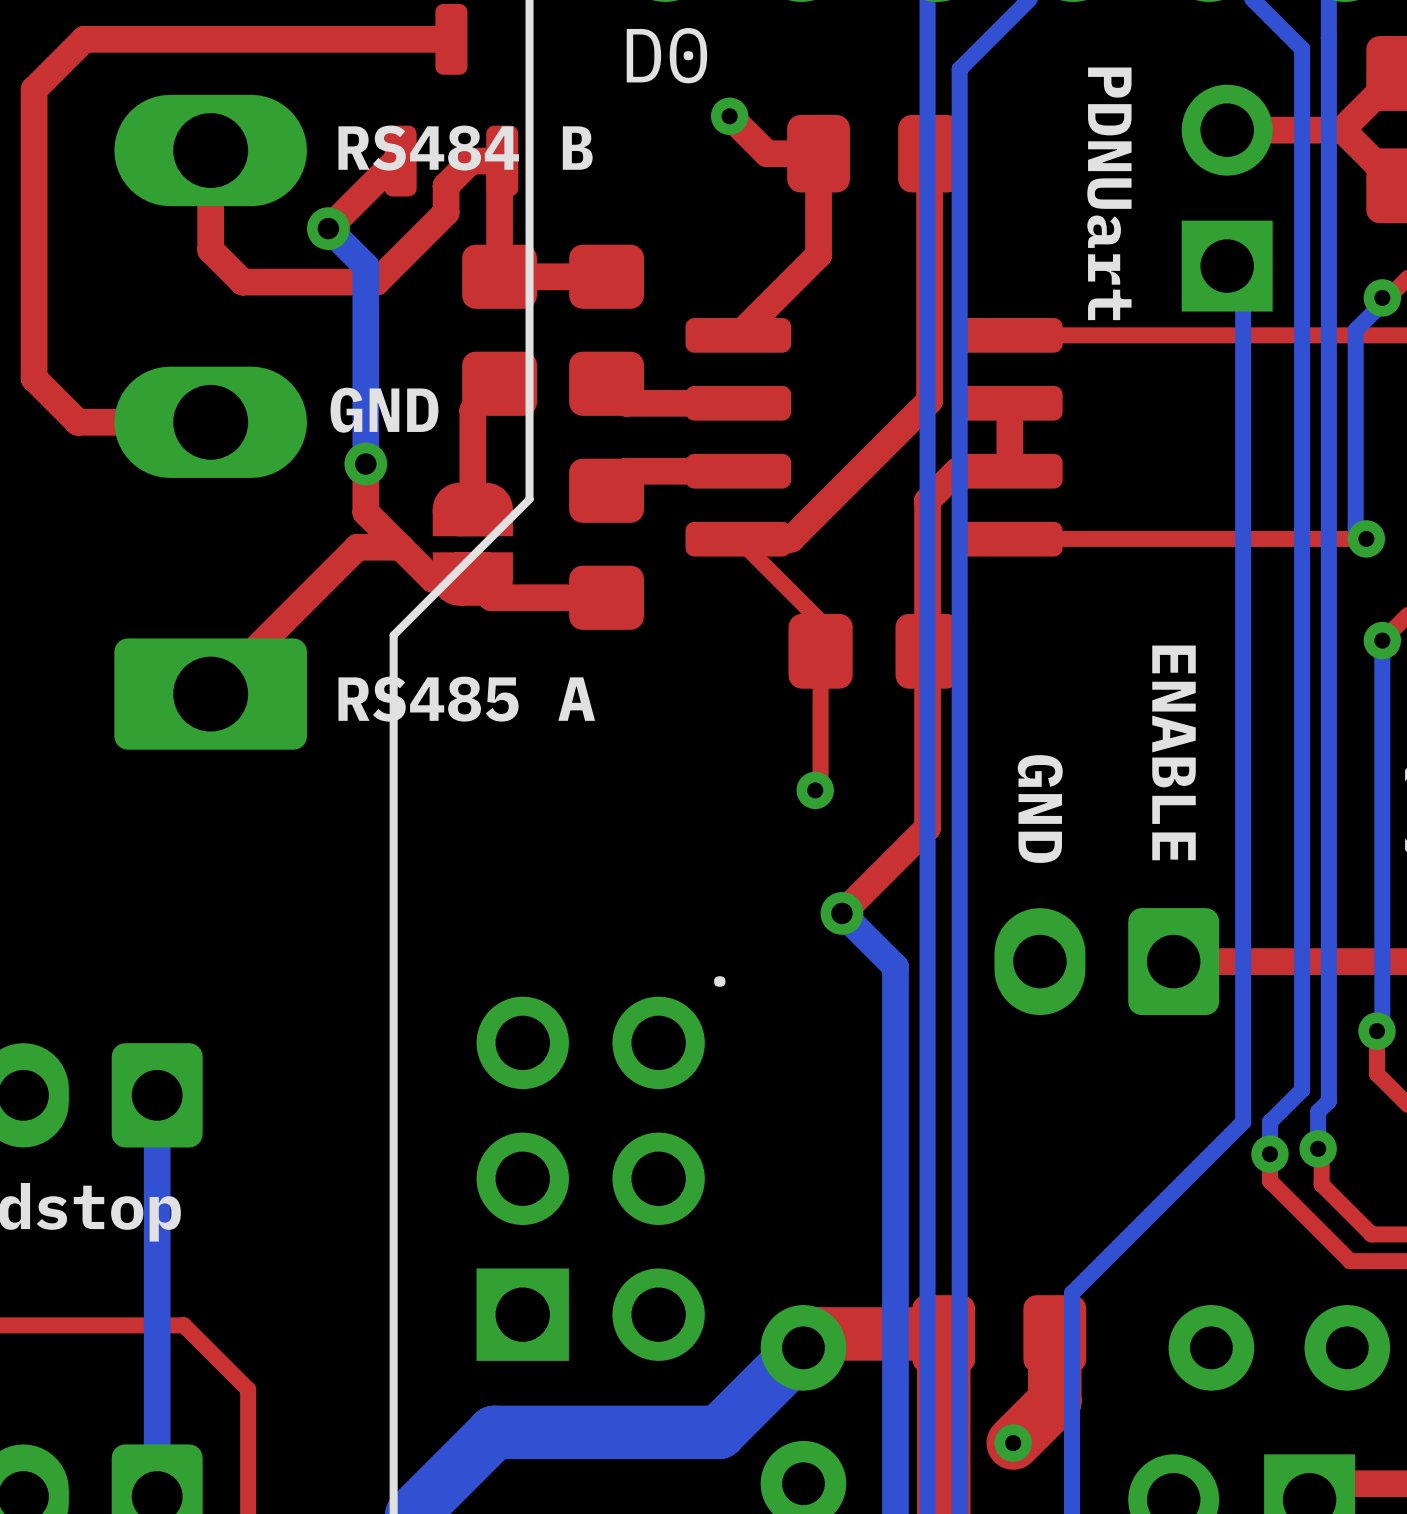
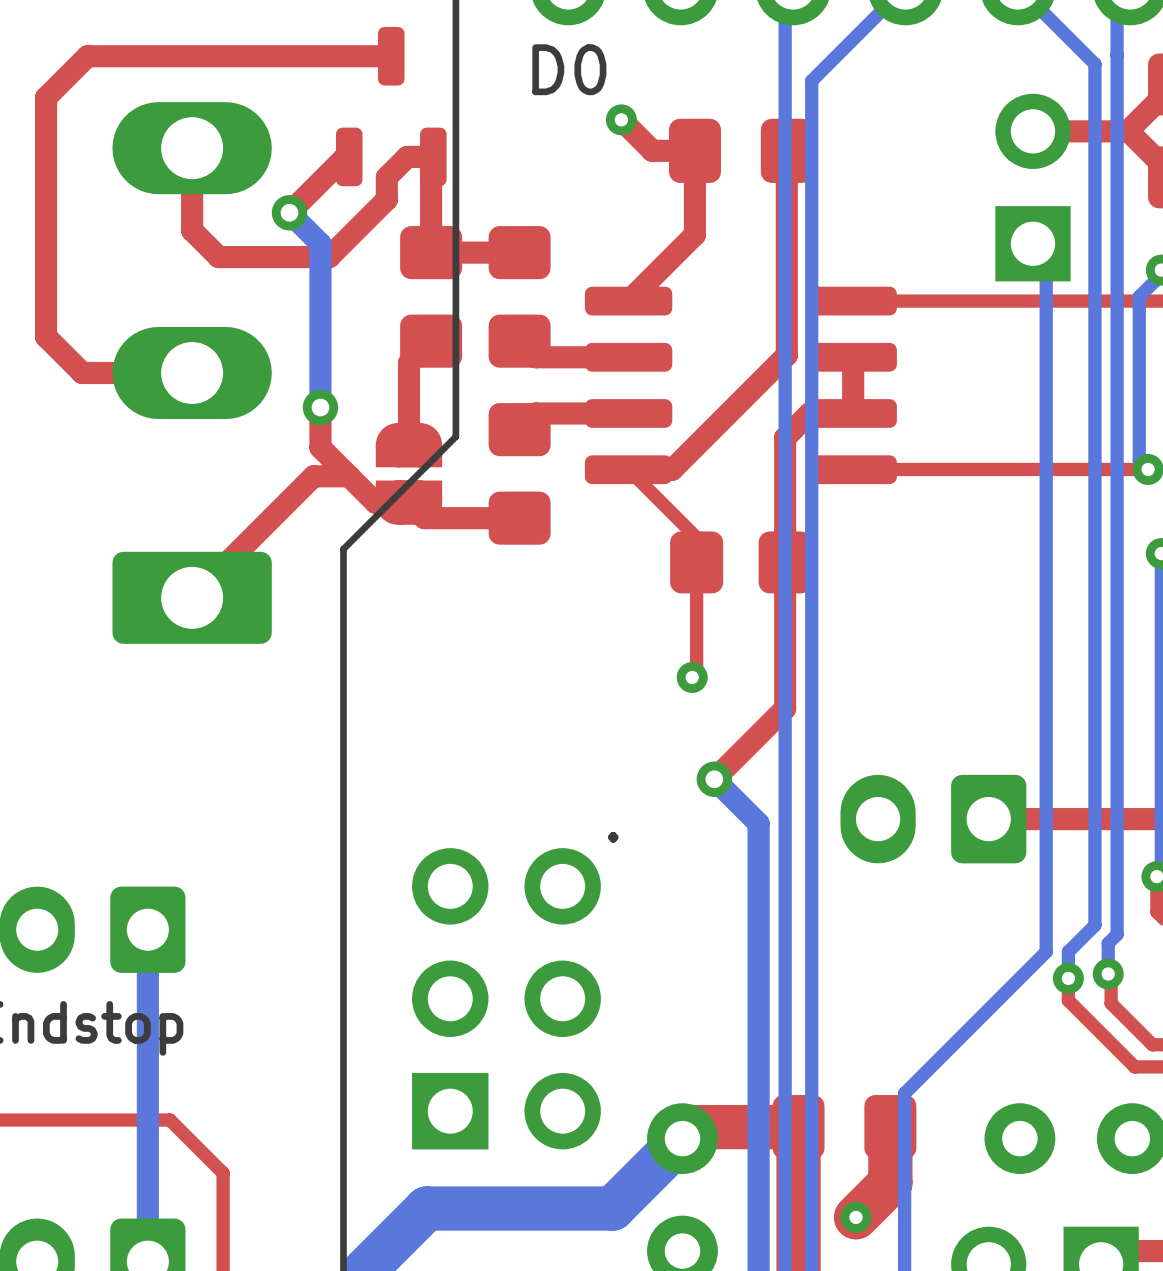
text: RS484 B (465, 148) -> none
text: PDNUart (1109, 193) -> none
text: GND (384, 410) -> none
text: RS485 A (466, 699) -> none
text: ENABLE (1173, 752) -> none
text: GND (1040, 809) -> none

